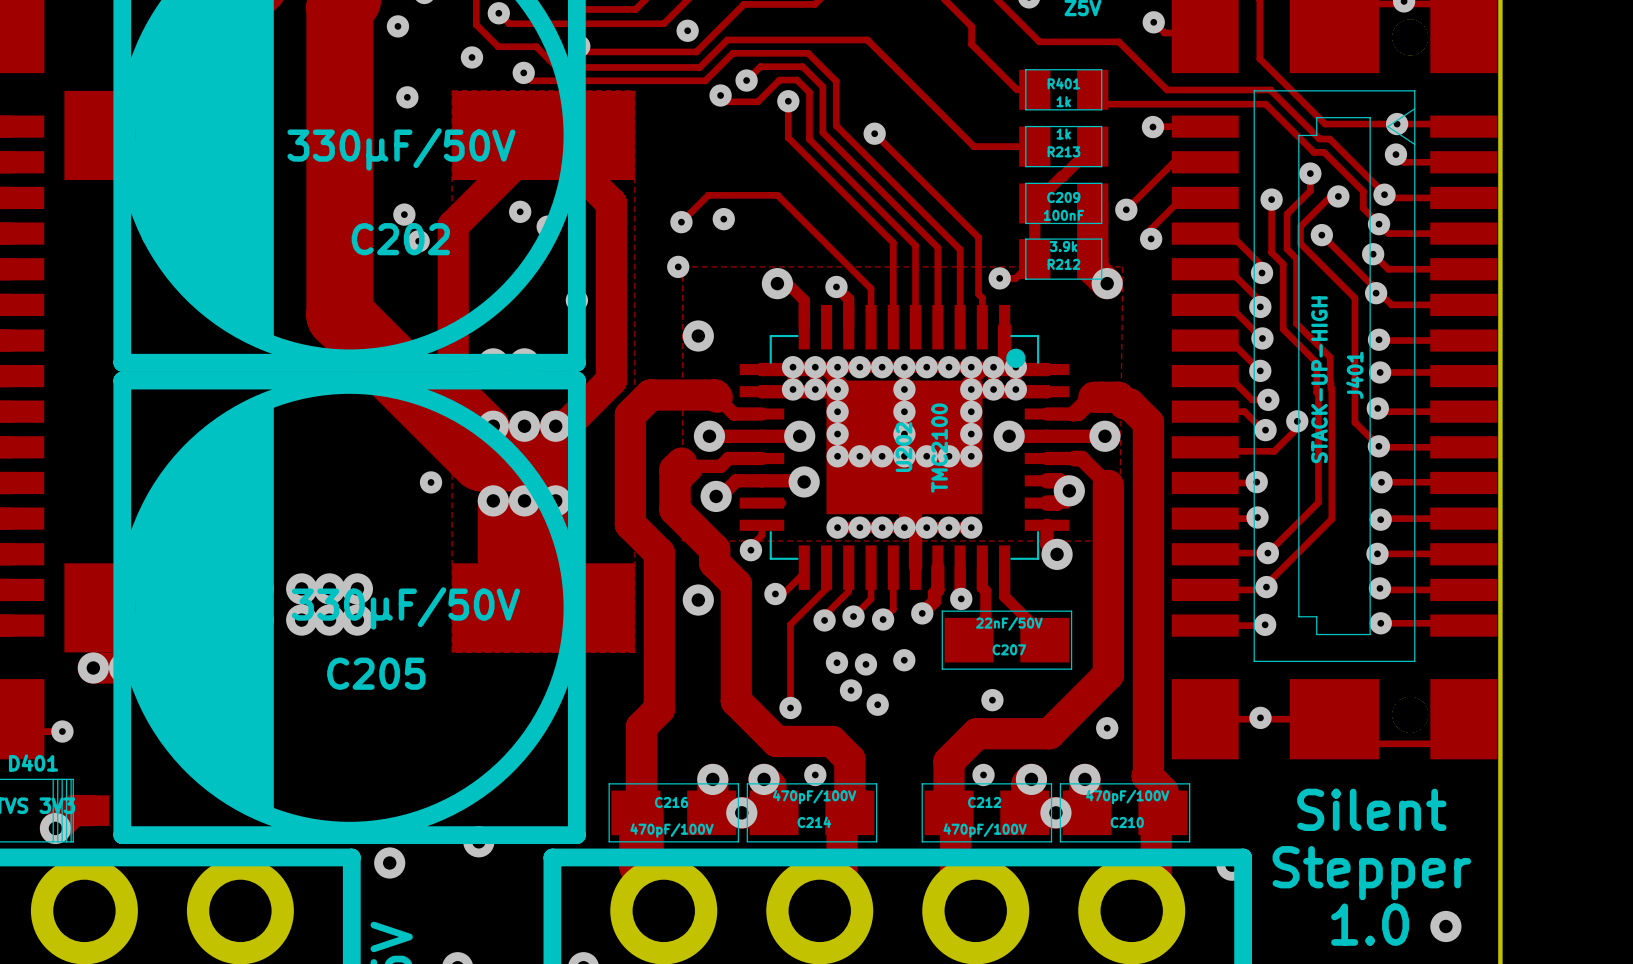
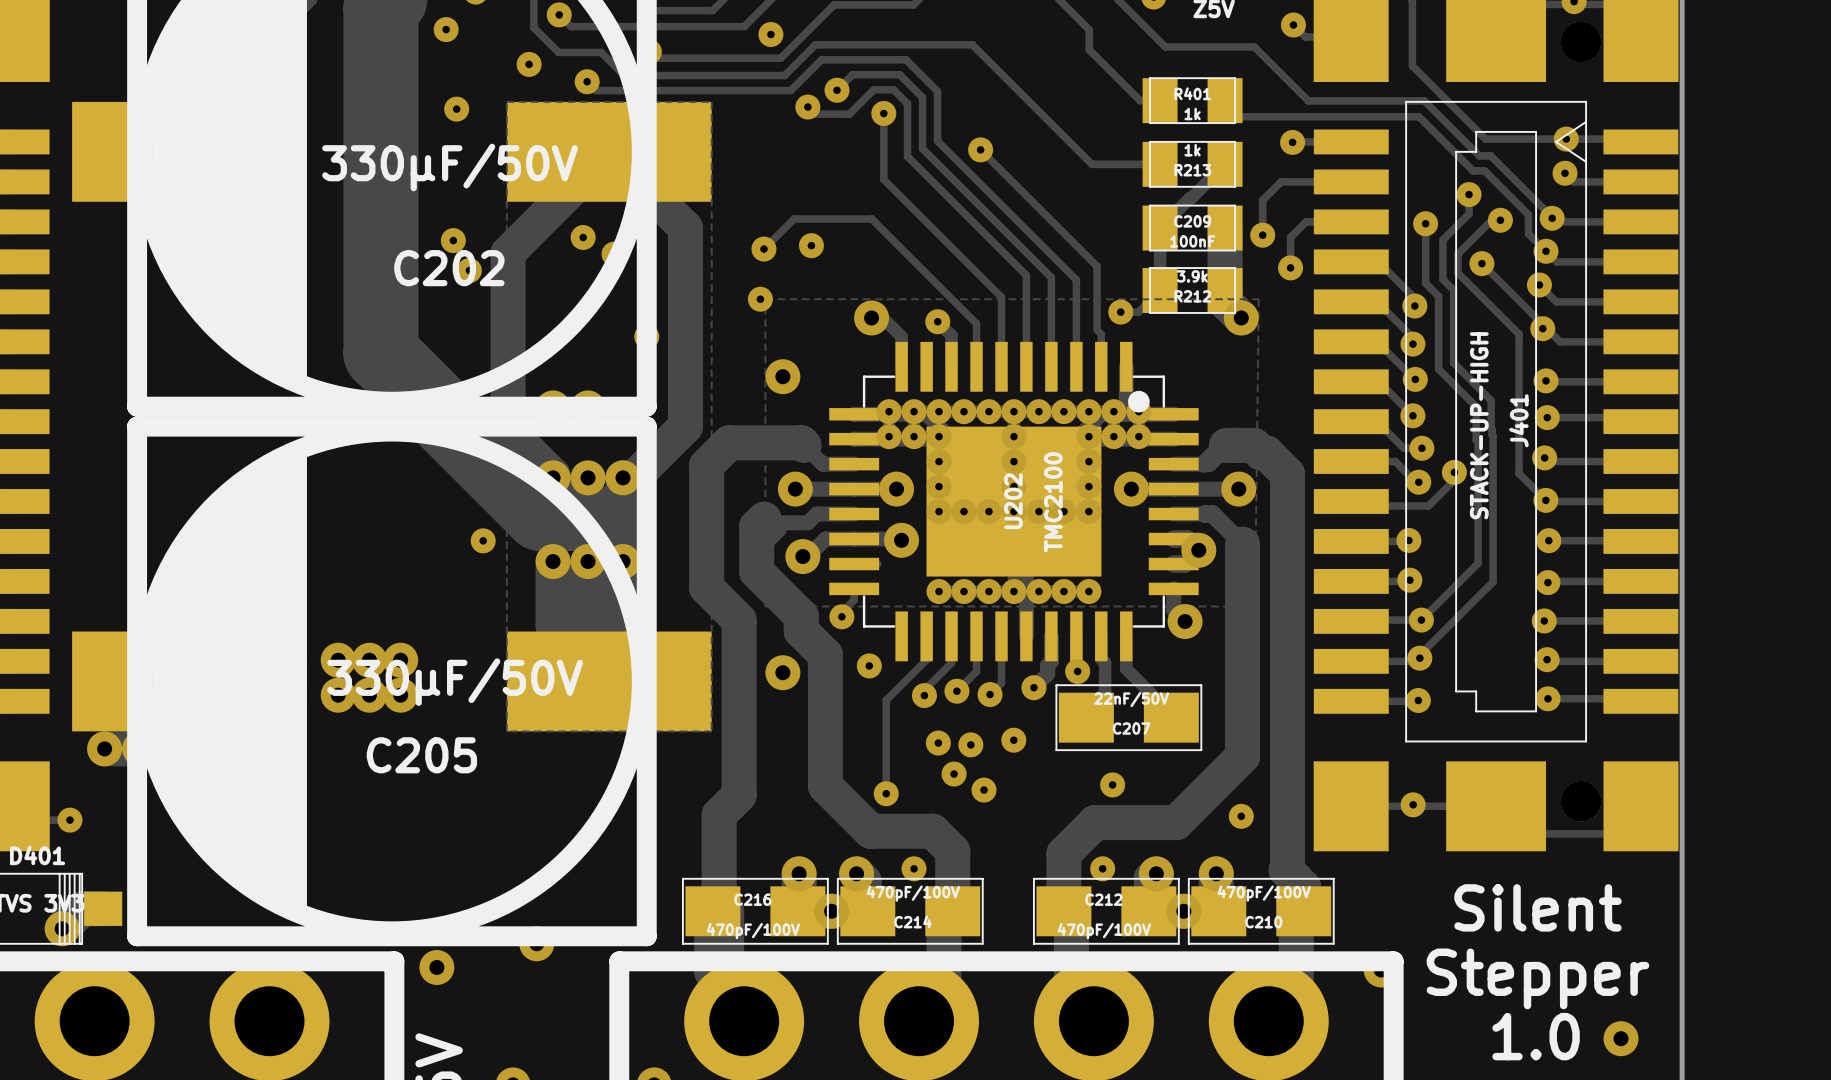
track: (788, 137) (893, 242) (893, 265) -> (883, 154) (883, 179) (1001, 297)
track: (1173, 162) (1126, 209) -> (1351, 181) (1281, 181) (1262, 200) (1262, 235)
track: (1182, 197) (1151, 228) -> (1351, 221) (1306, 221) (1290, 237) (1290, 256)
track: (804, 572) (783, 594) -> none

